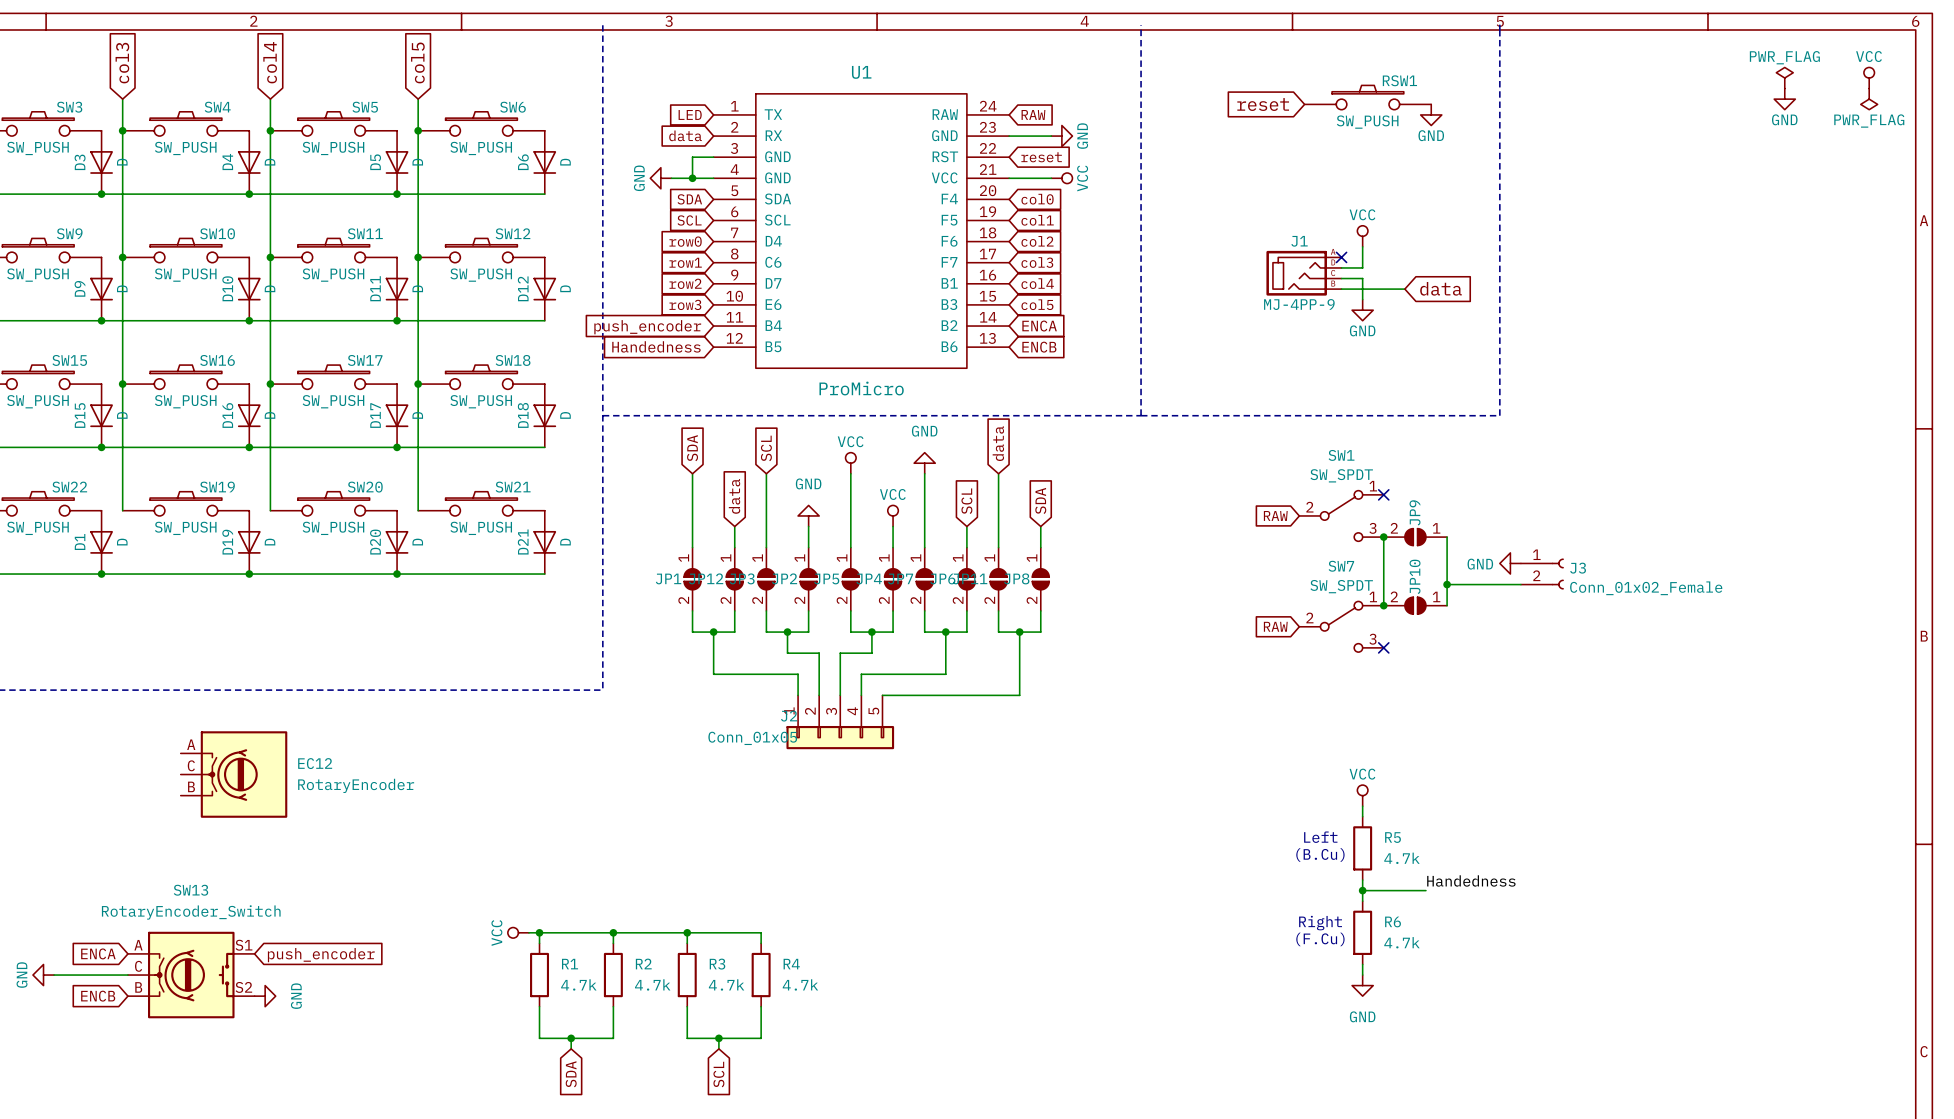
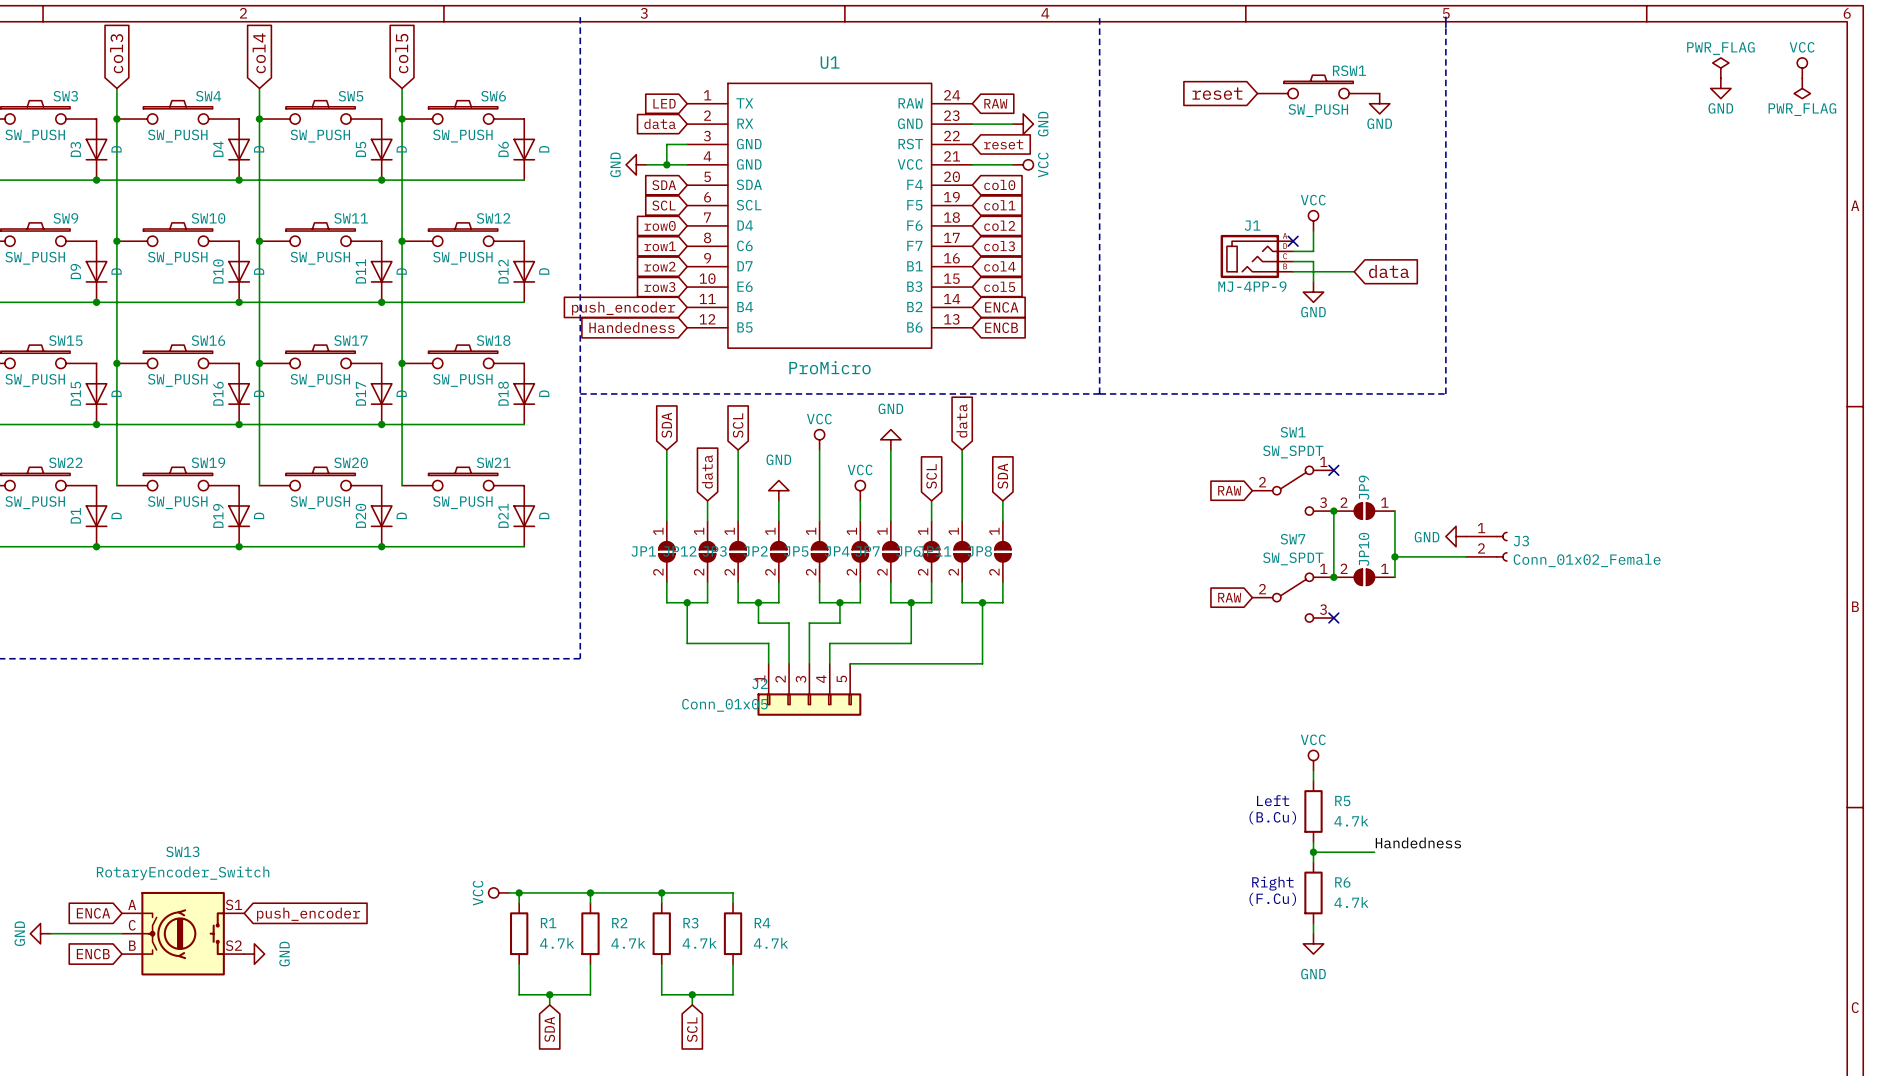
EC12: RotaryEncoder (234, 774) -> none

